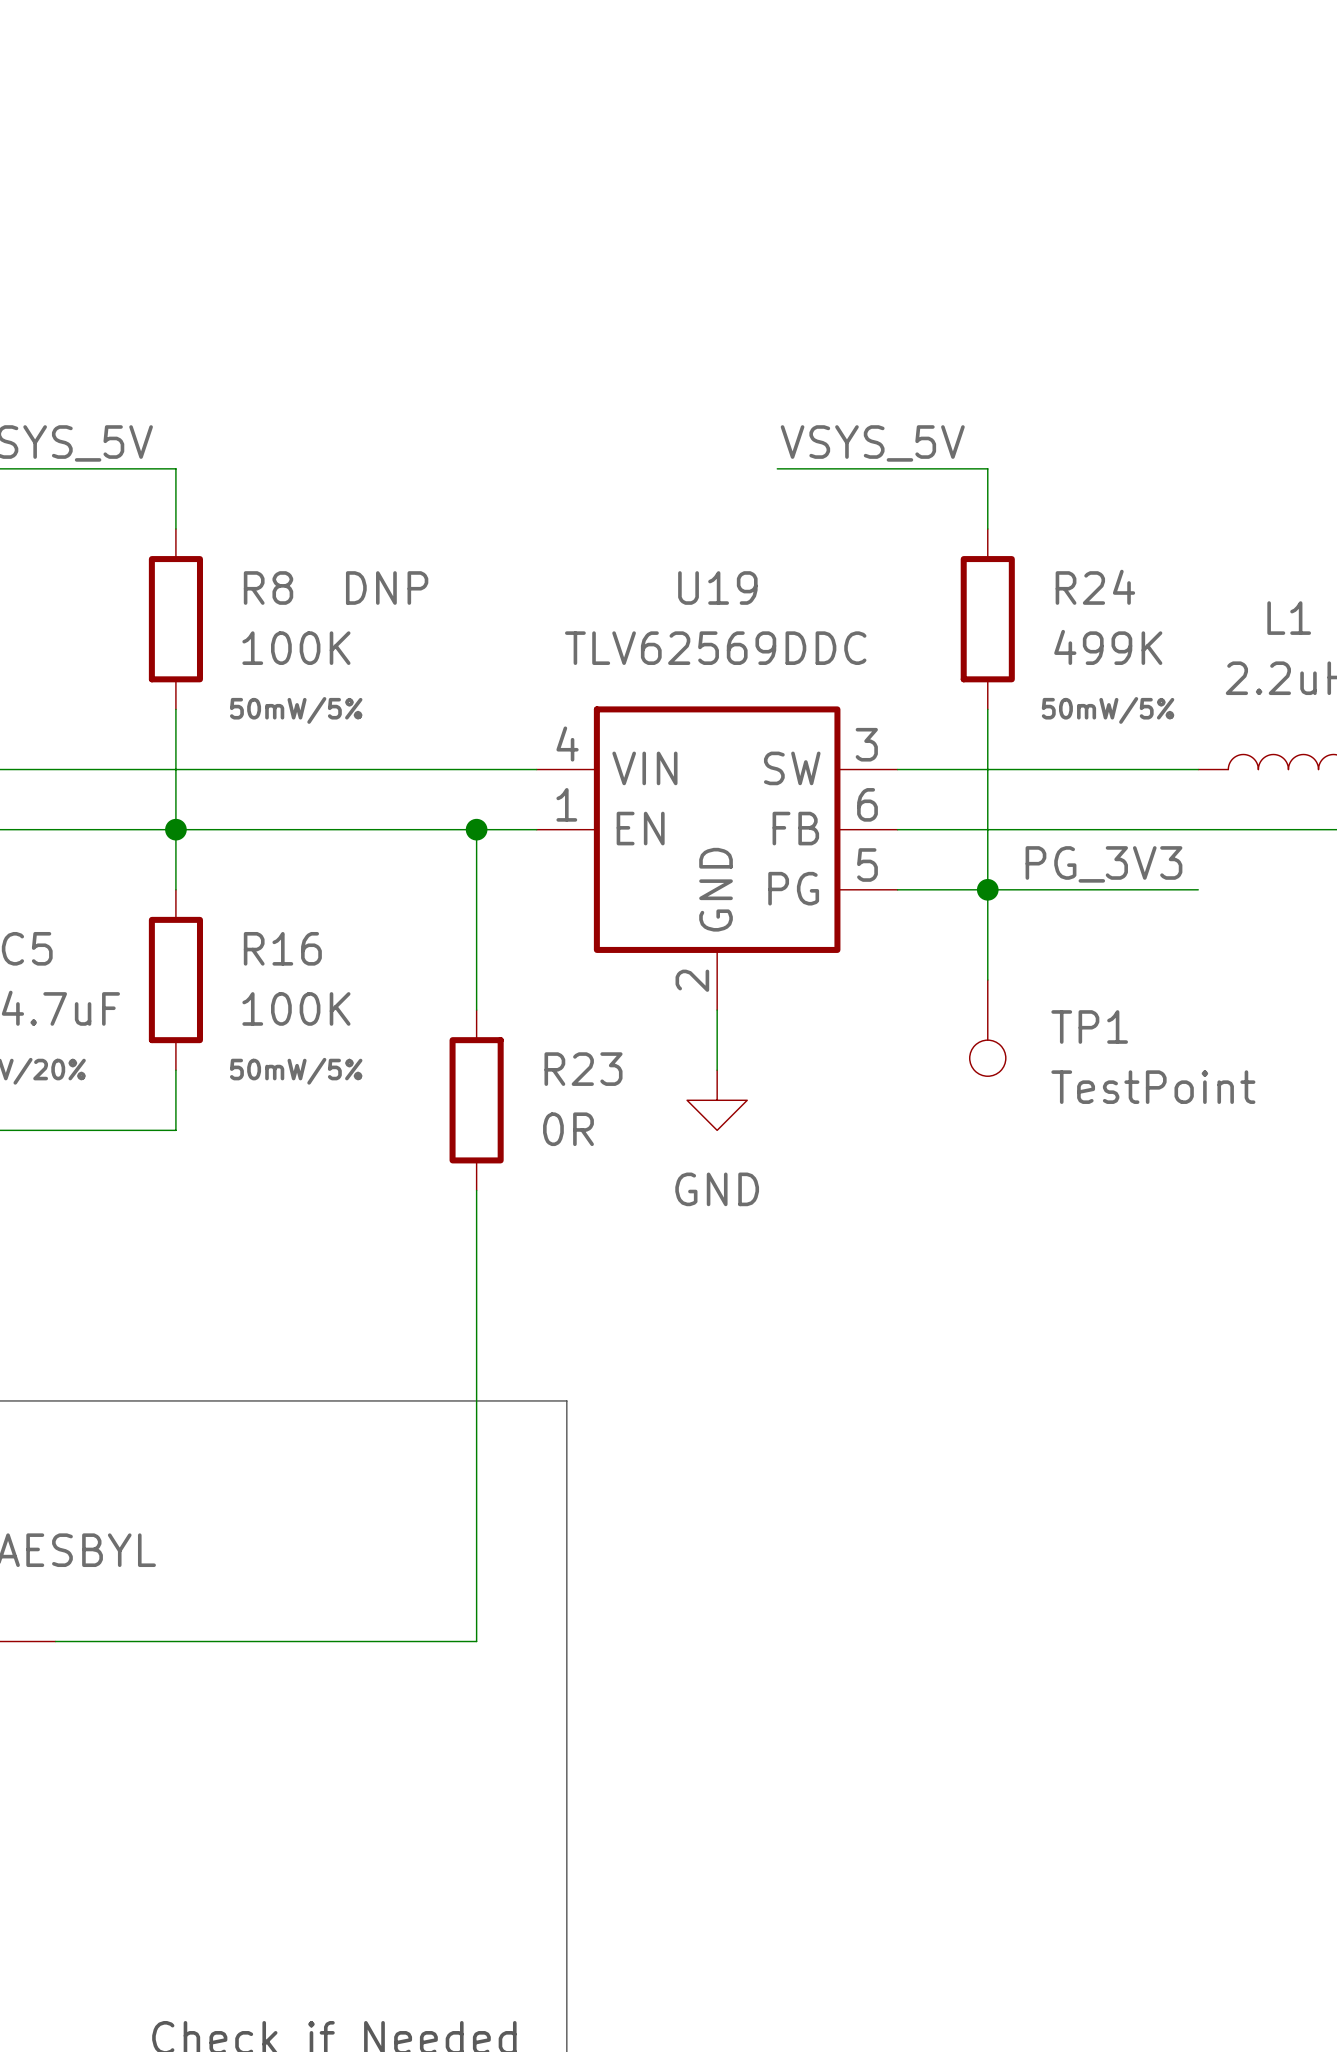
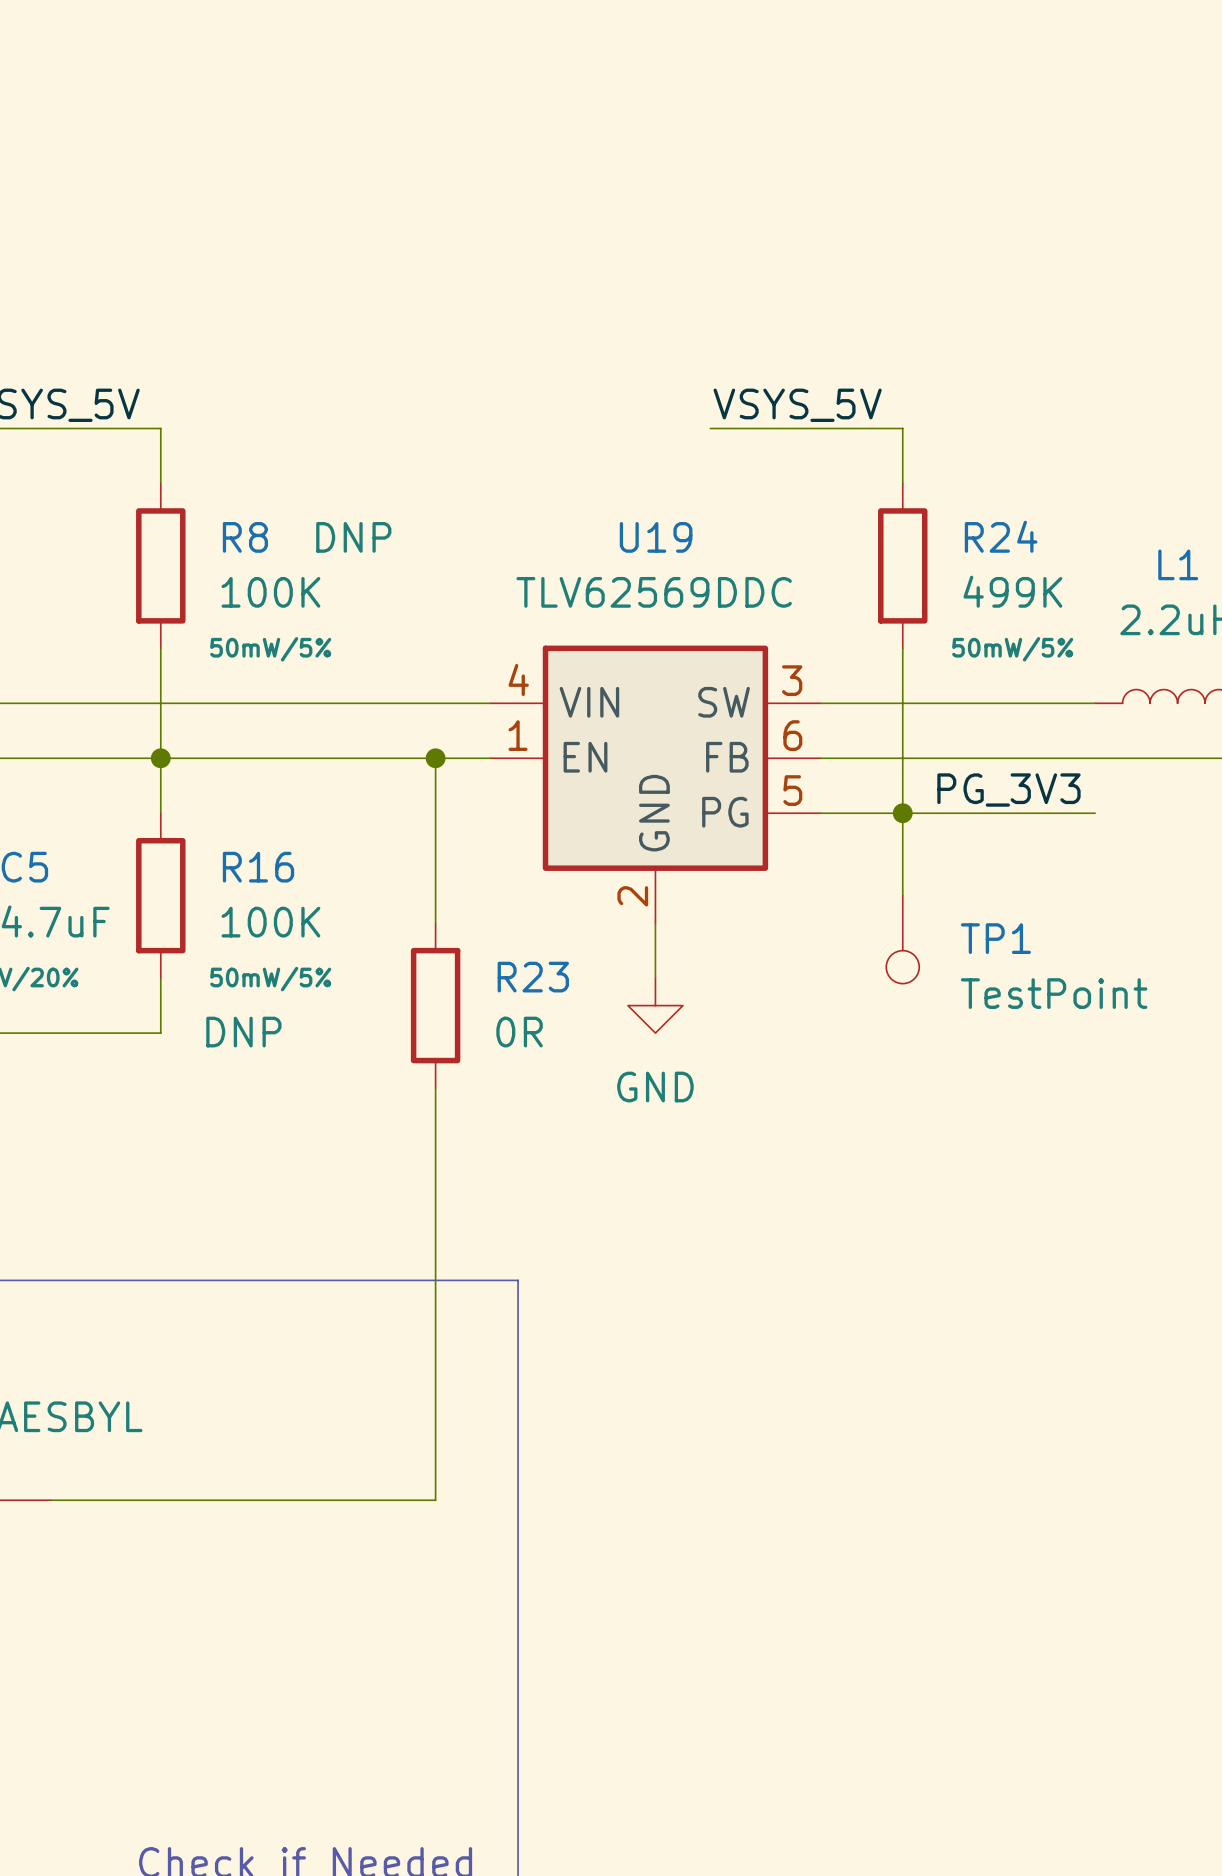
R16 text: none -> DNP (243, 1032)

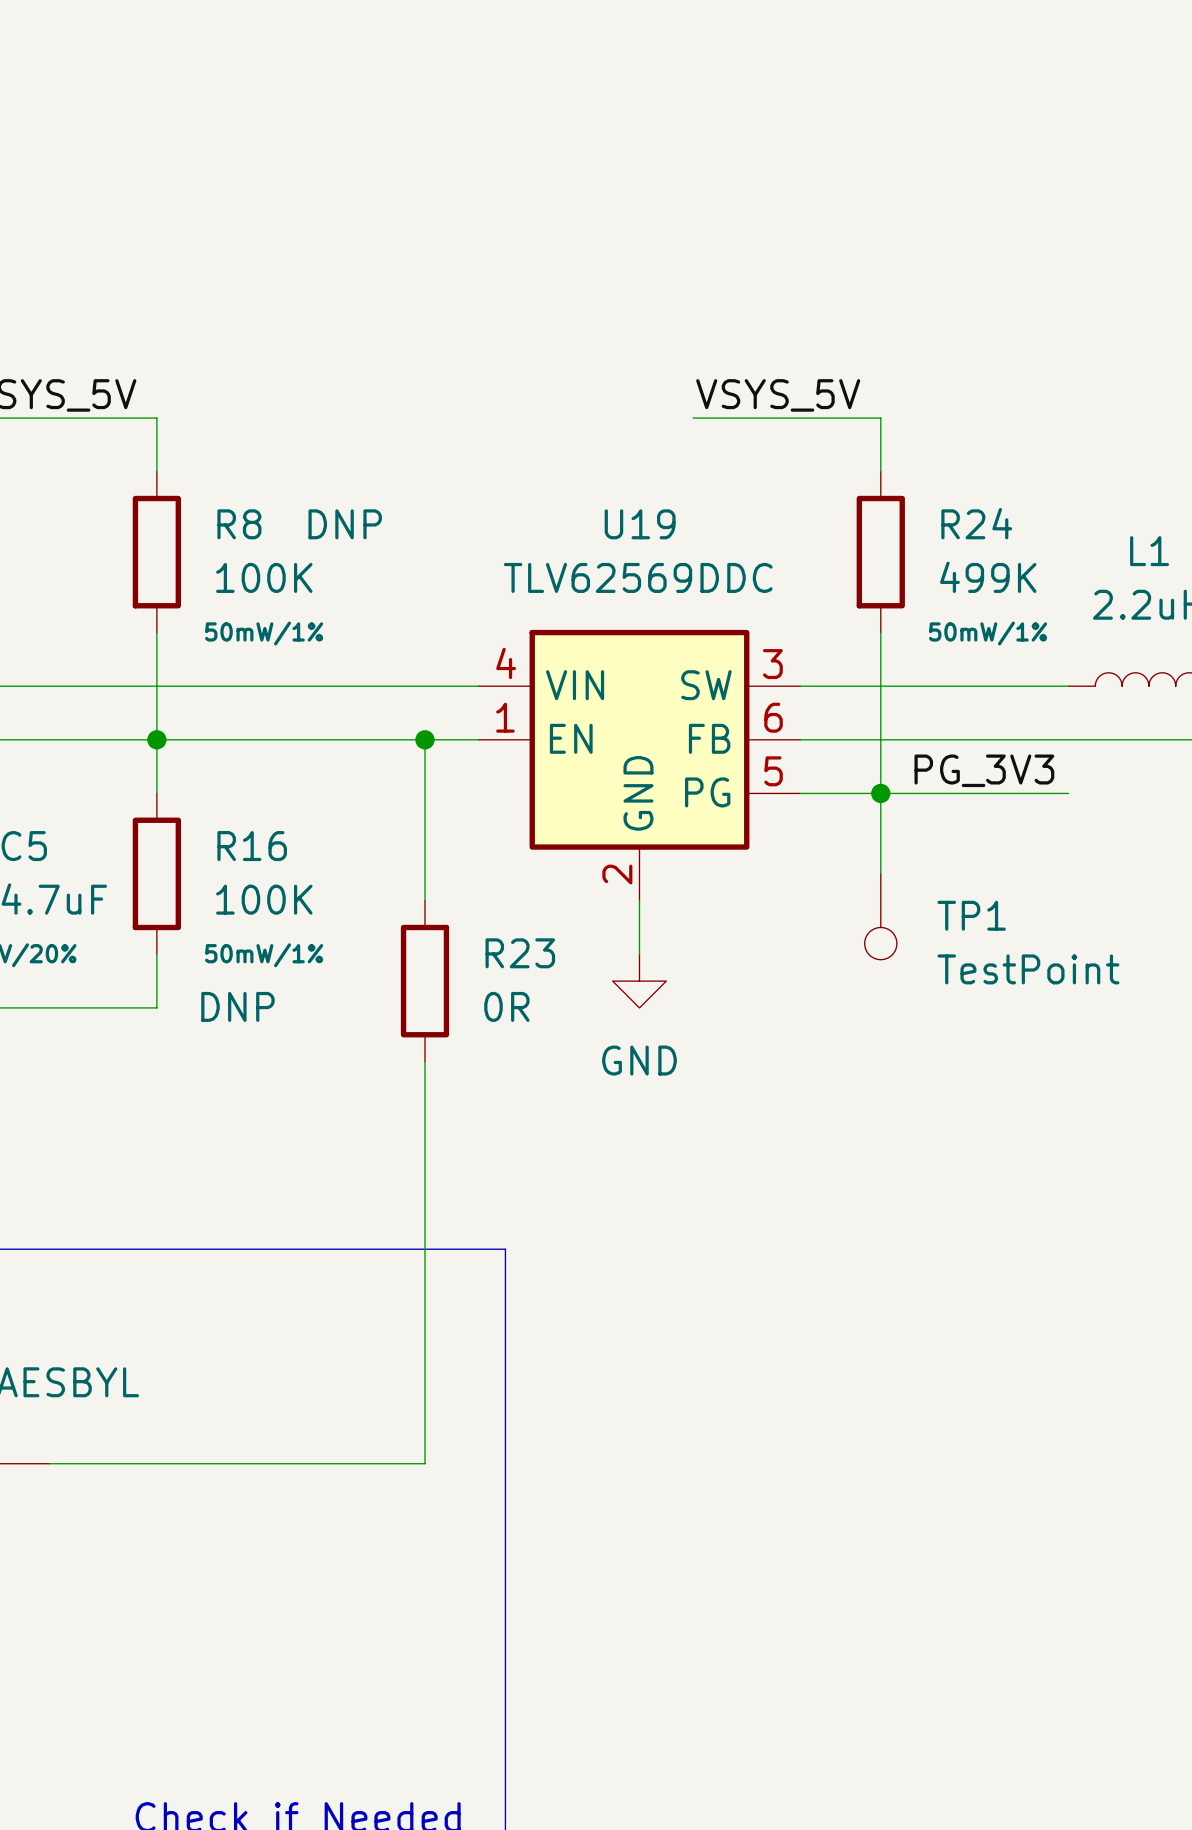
R8 text: 50mW/5% (270, 649) -> 50mW/1% (264, 633)
R24 text: 50mW/5% (1012, 649) -> 50mW/1% (988, 633)
R16 text: 50mW/5% (270, 979) -> 50mW/1% (264, 955)

